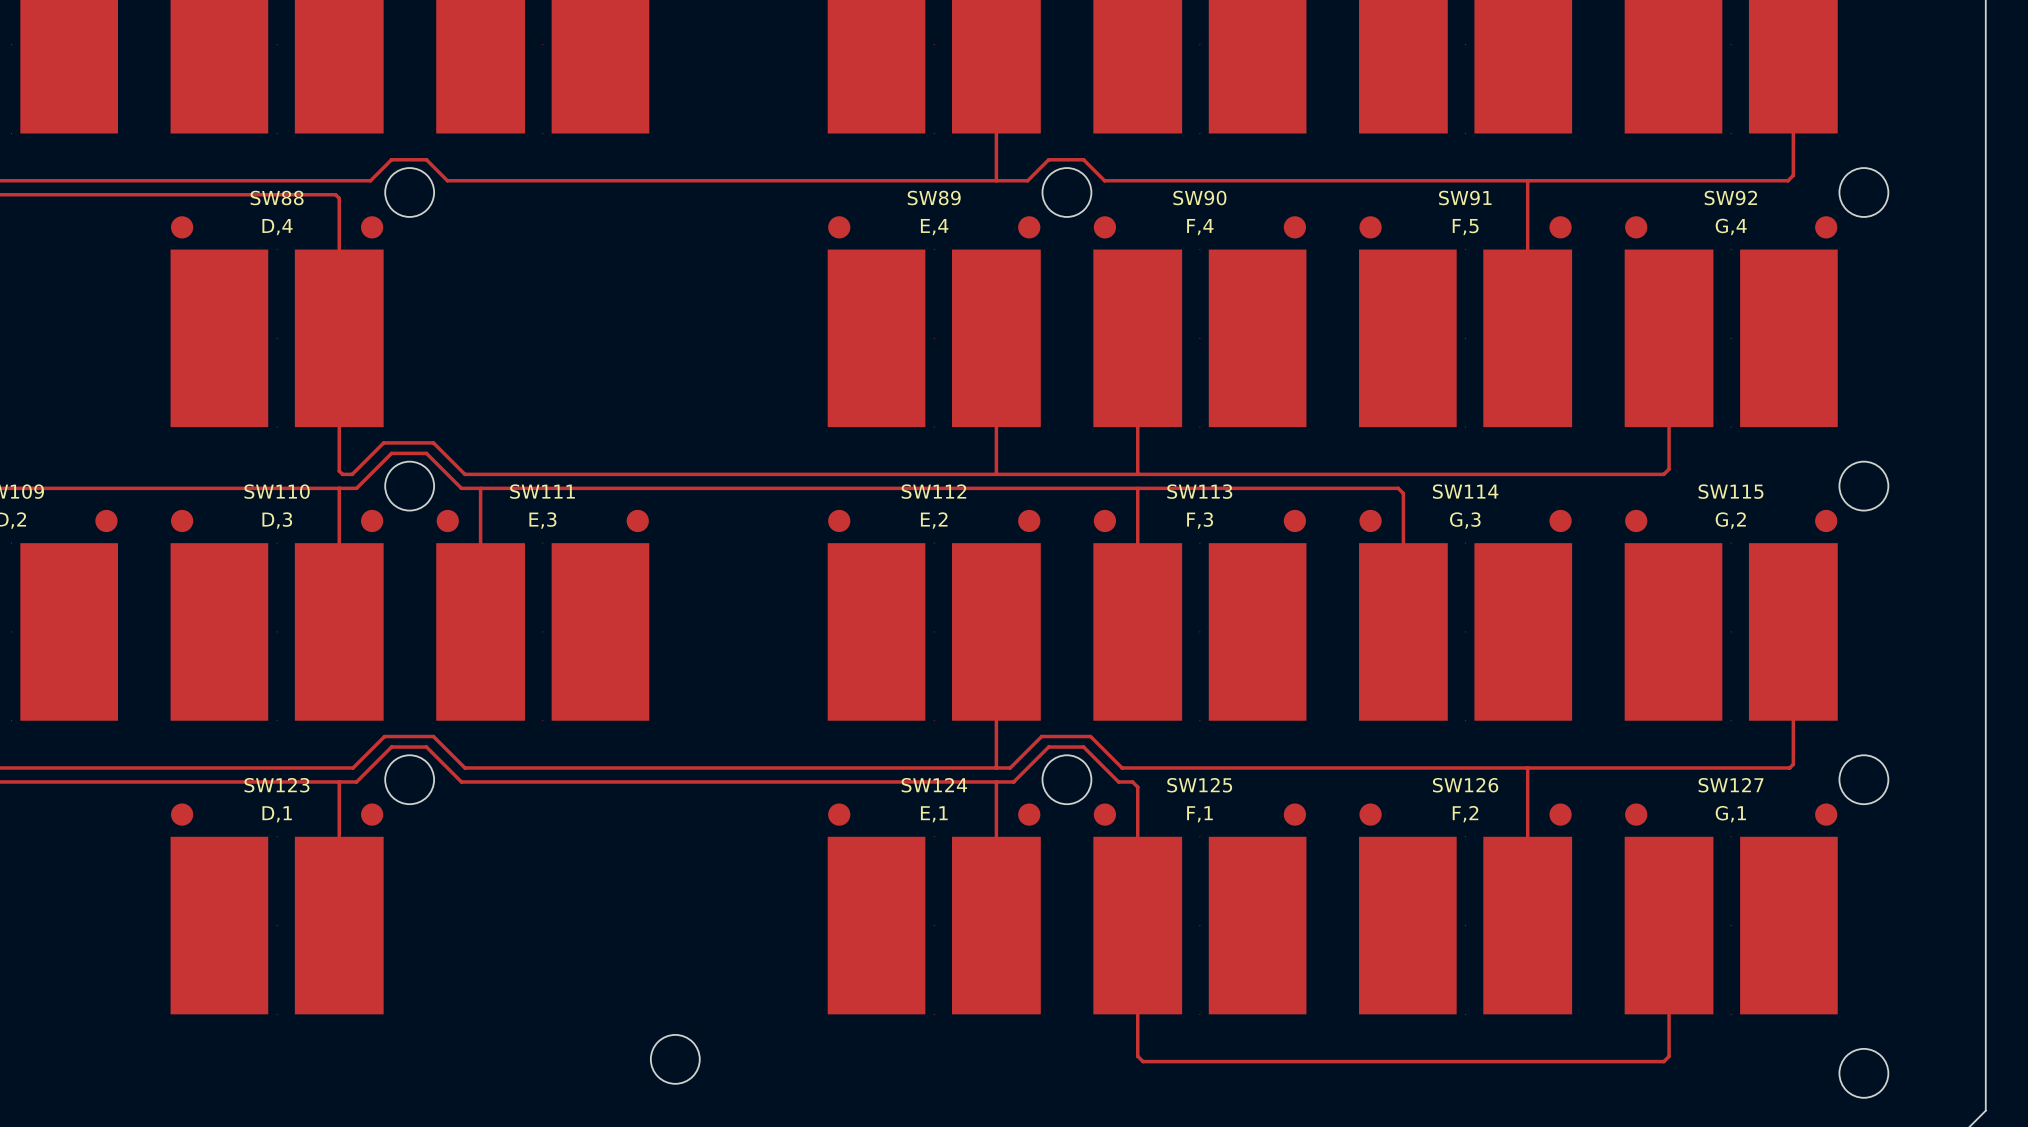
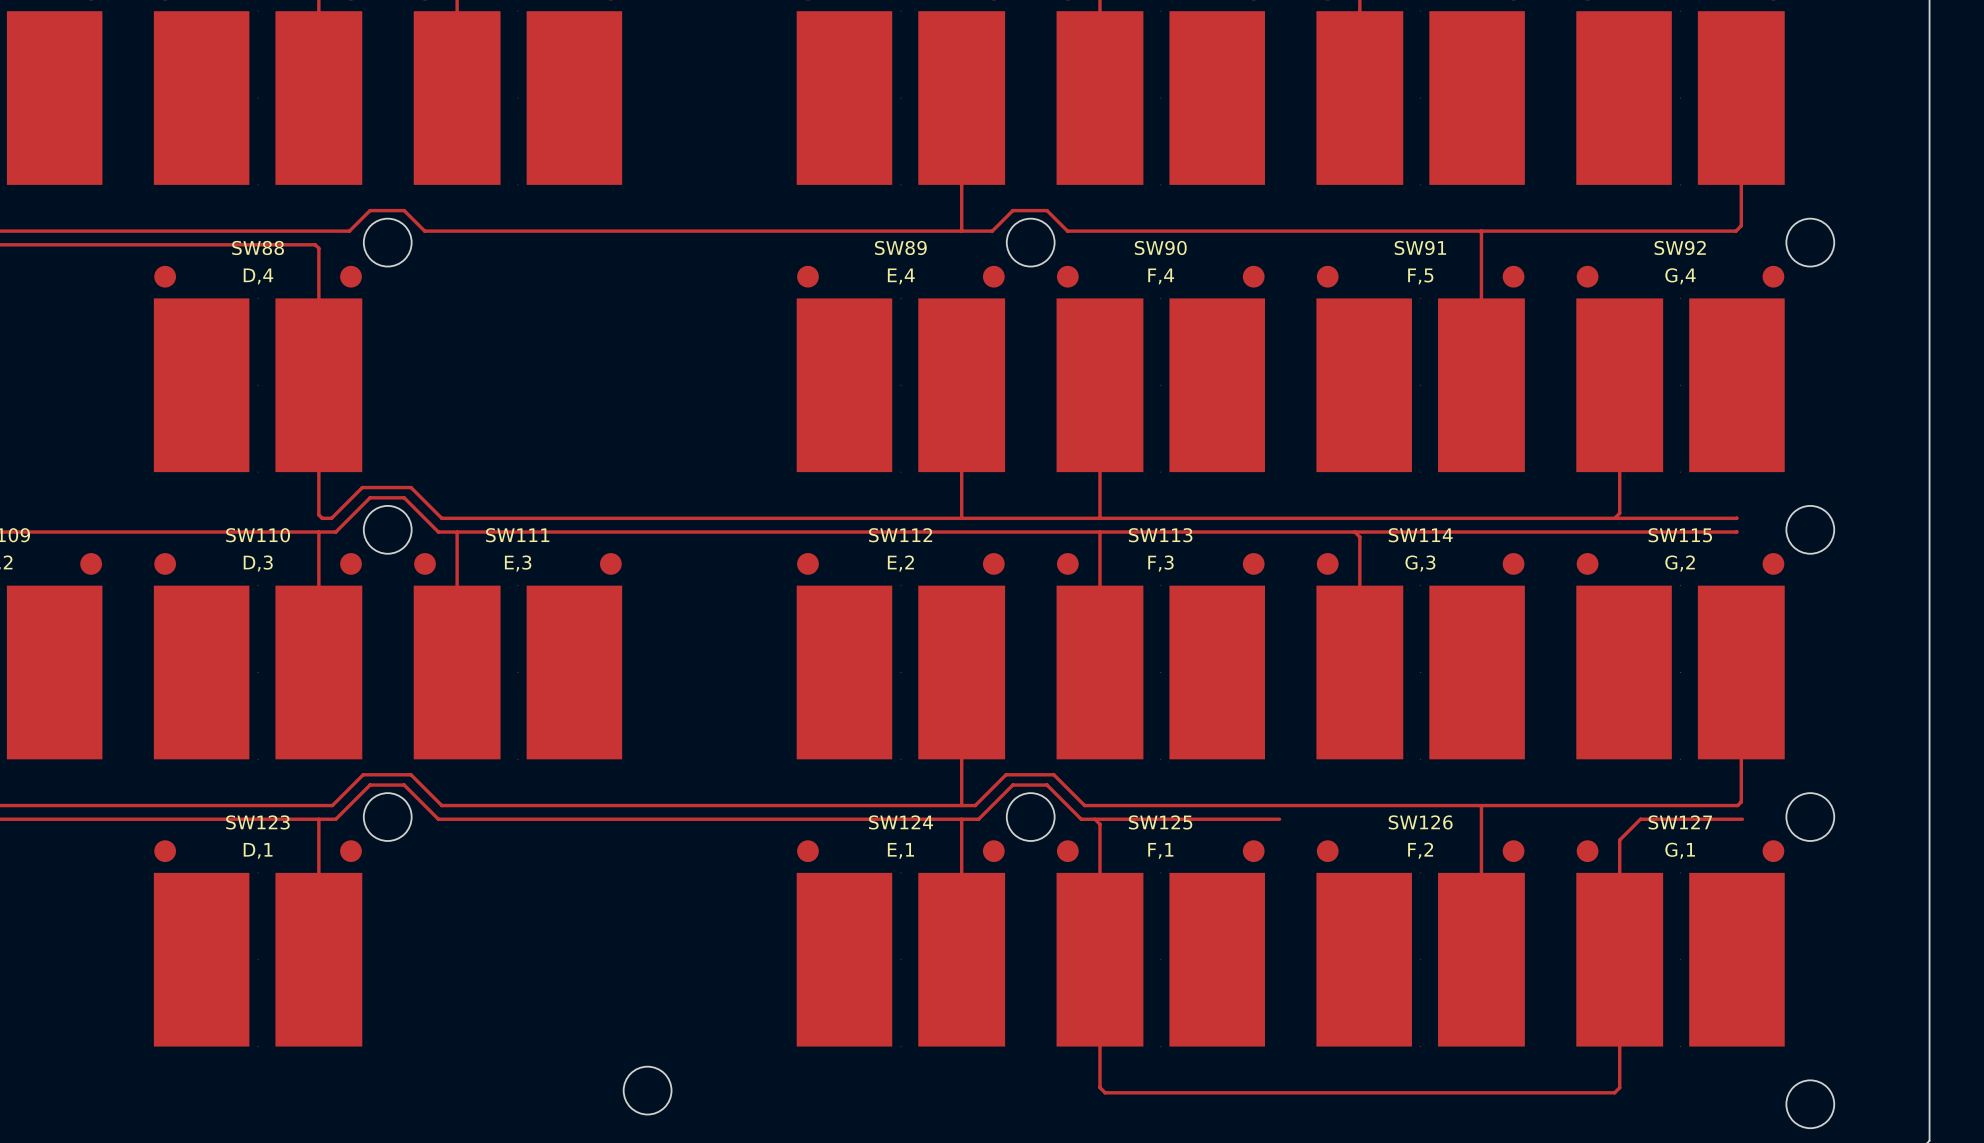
track: none -> (1736, 518) (1614, 518)
track: none -> (1736, 531) (1354, 532)
track: none -> (1094, 819) (1279, 819)
track: none -> (1742, 819) (1640, 819) (1619, 840) (1619, 959)

